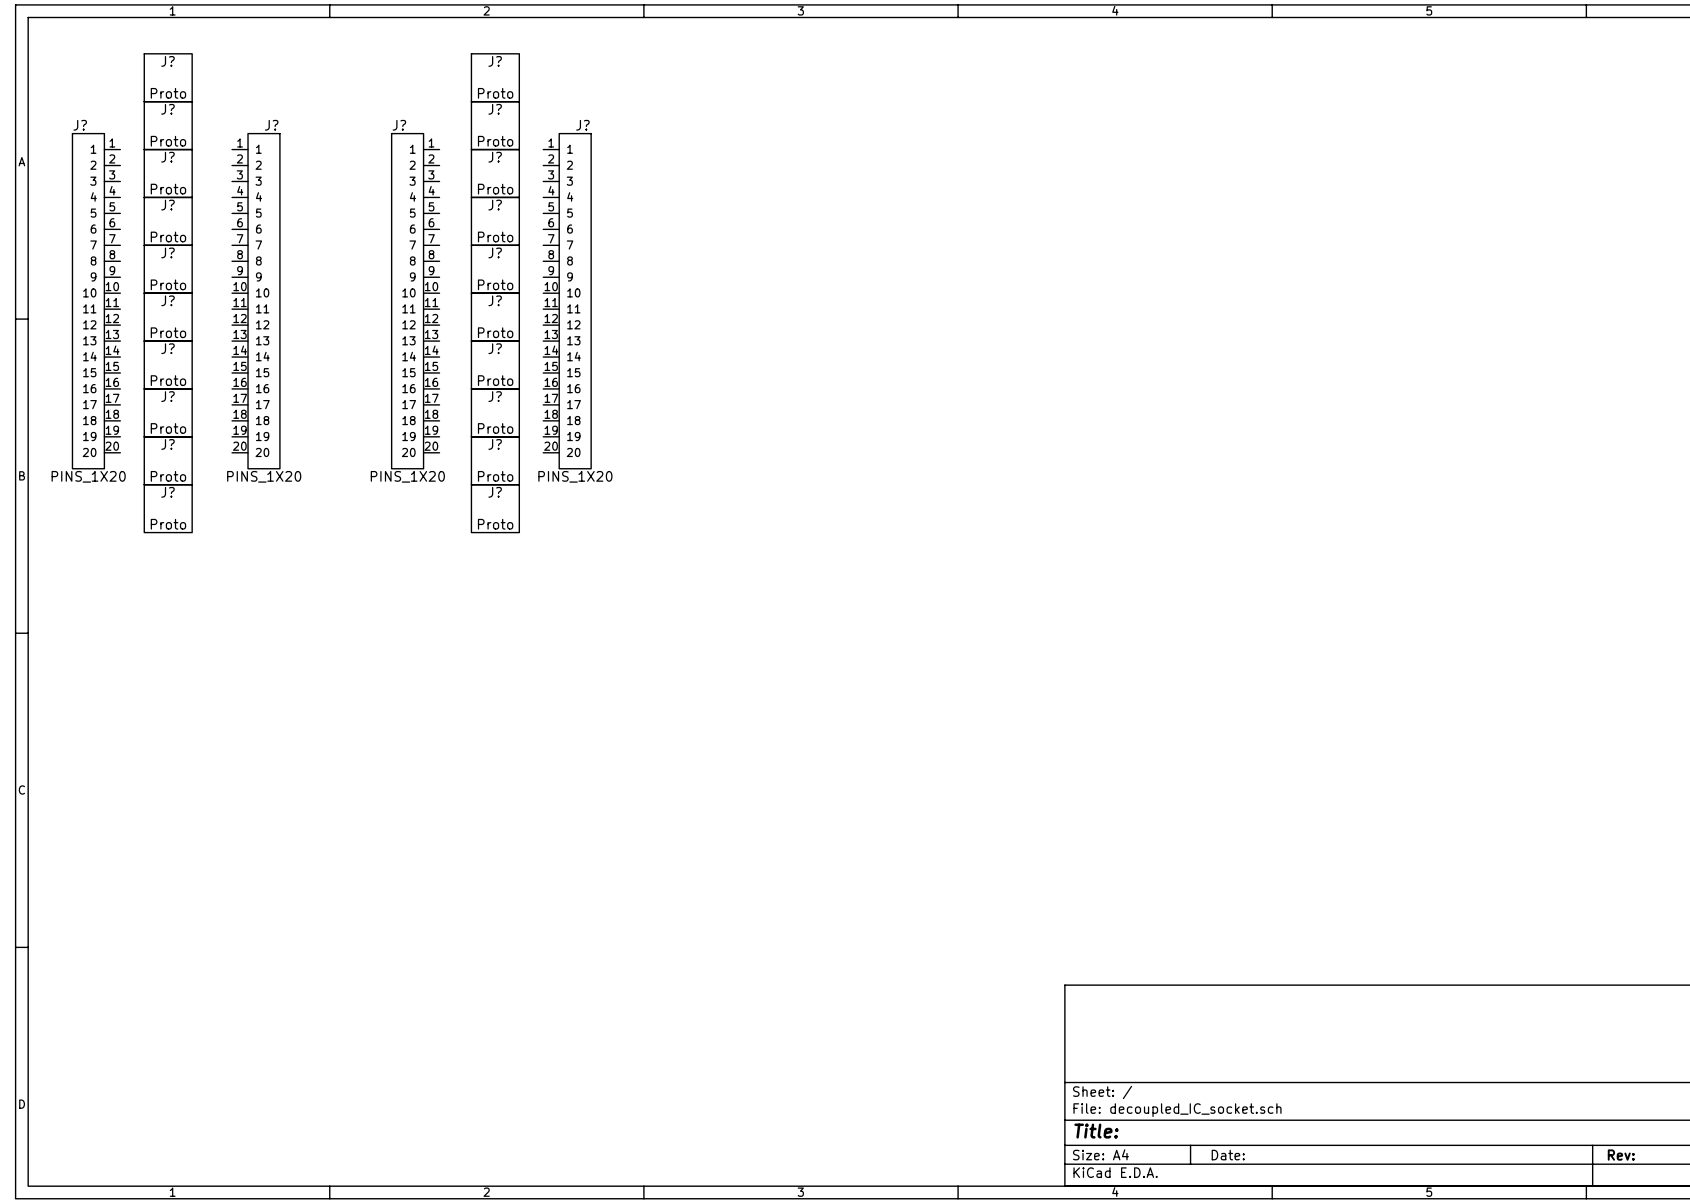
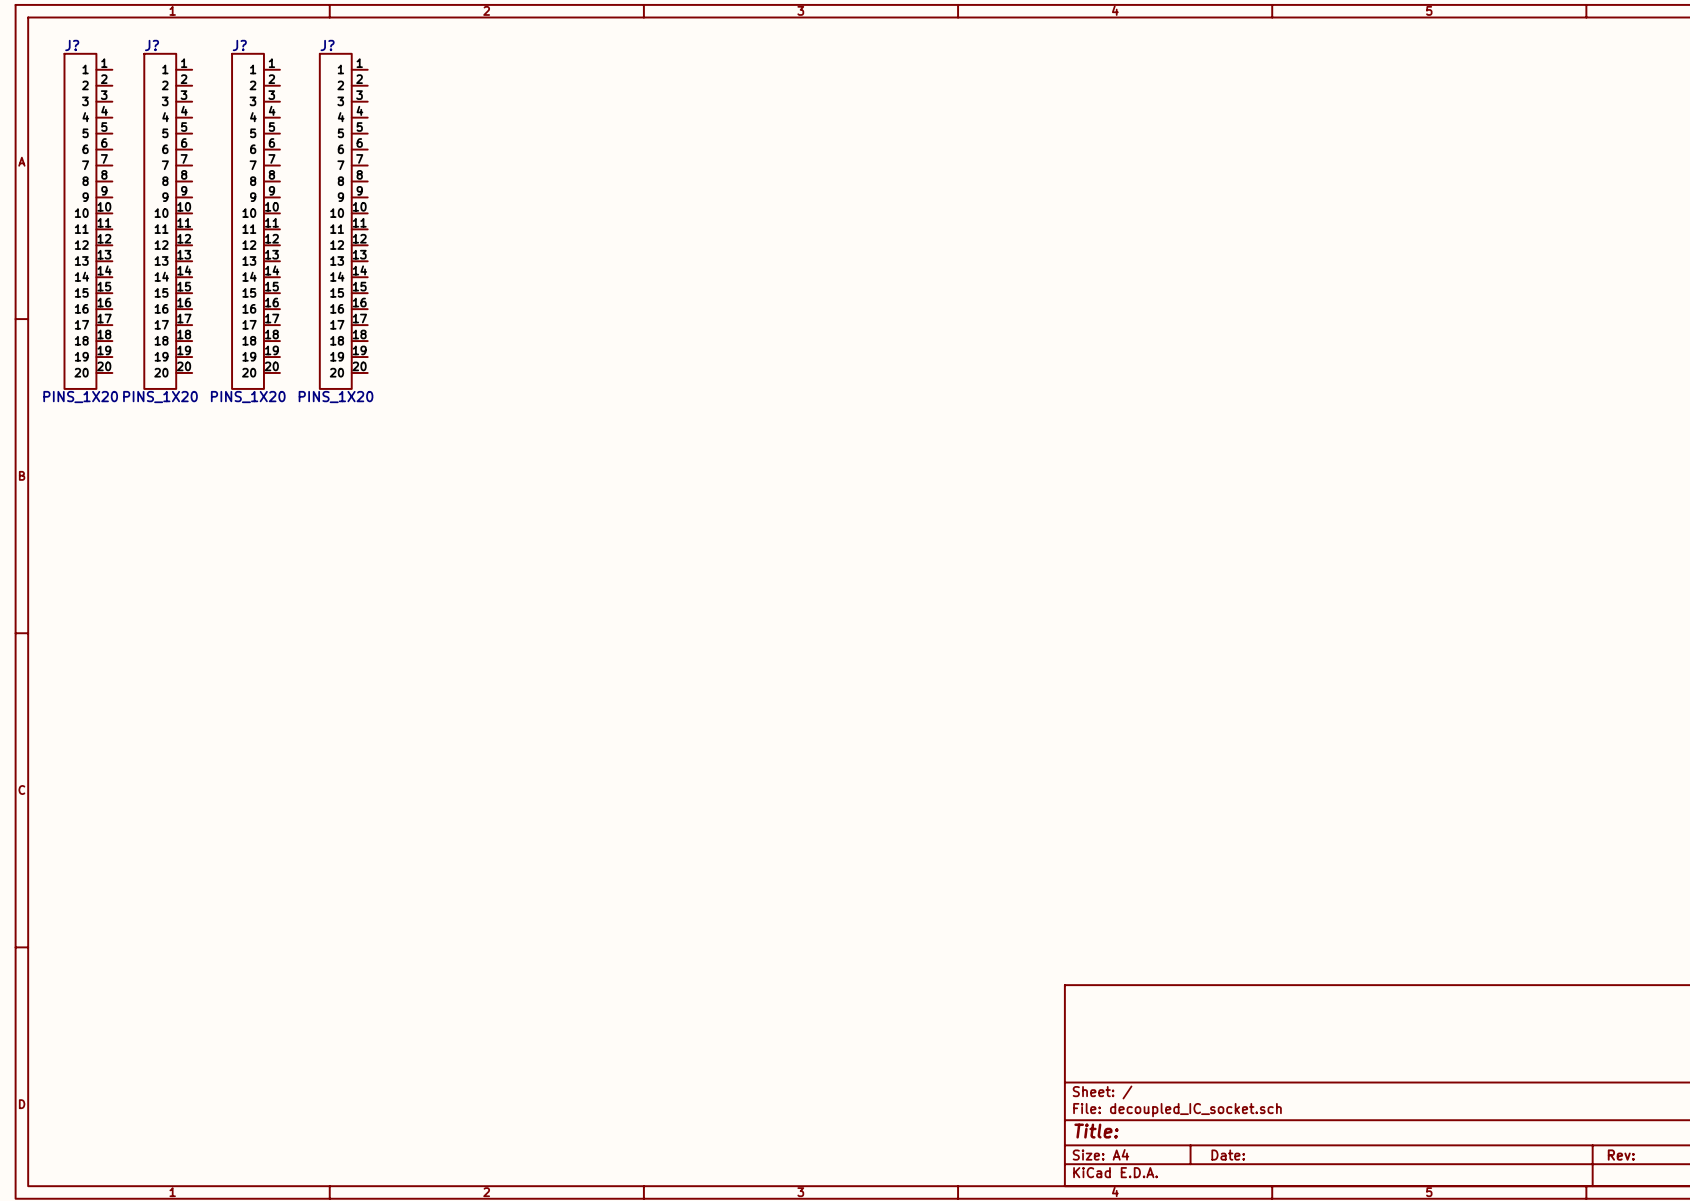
J?: Proto (168, 77) -> none
J?: Proto (495, 77) -> none
J?: Proto (168, 125) -> none
J?: Proto (495, 125) -> none
J?: Proto (168, 173) -> none
J?: Proto (495, 173) -> none
J? symbol: [144, 197, 193, 246] -> [144, 53, 193, 389]
J? name position: J? (167, 205) -> J? (152, 45)
J?: none -> PINS_1X20 (255, 221)
J?: none -> PINS_1X20 (343, 221)
J?: Proto (495, 221) -> none
J? value: Proto (168, 236) -> PINS_1X20 (160, 397)
J?: Proto (168, 269) -> none
J?: Proto (495, 269) -> none
J? position: (96, 301) -> (88, 221)
J?: PINS_1X20 (255, 301) -> none
J?: PINS_1X20 (415, 301) -> none
J?: PINS_1X20 (567, 301) -> none
J?: Proto (168, 317) -> none
J?: Proto (495, 317) -> none
J?: Proto (168, 365) -> none
J?: Proto (495, 365) -> none
J?: Proto (168, 412) -> none
J?: Proto (495, 412) -> none
J?: Proto (168, 460) -> none
J?: Proto (495, 460) -> none
J?: Proto (168, 508) -> none
J?: Proto (495, 508) -> none

